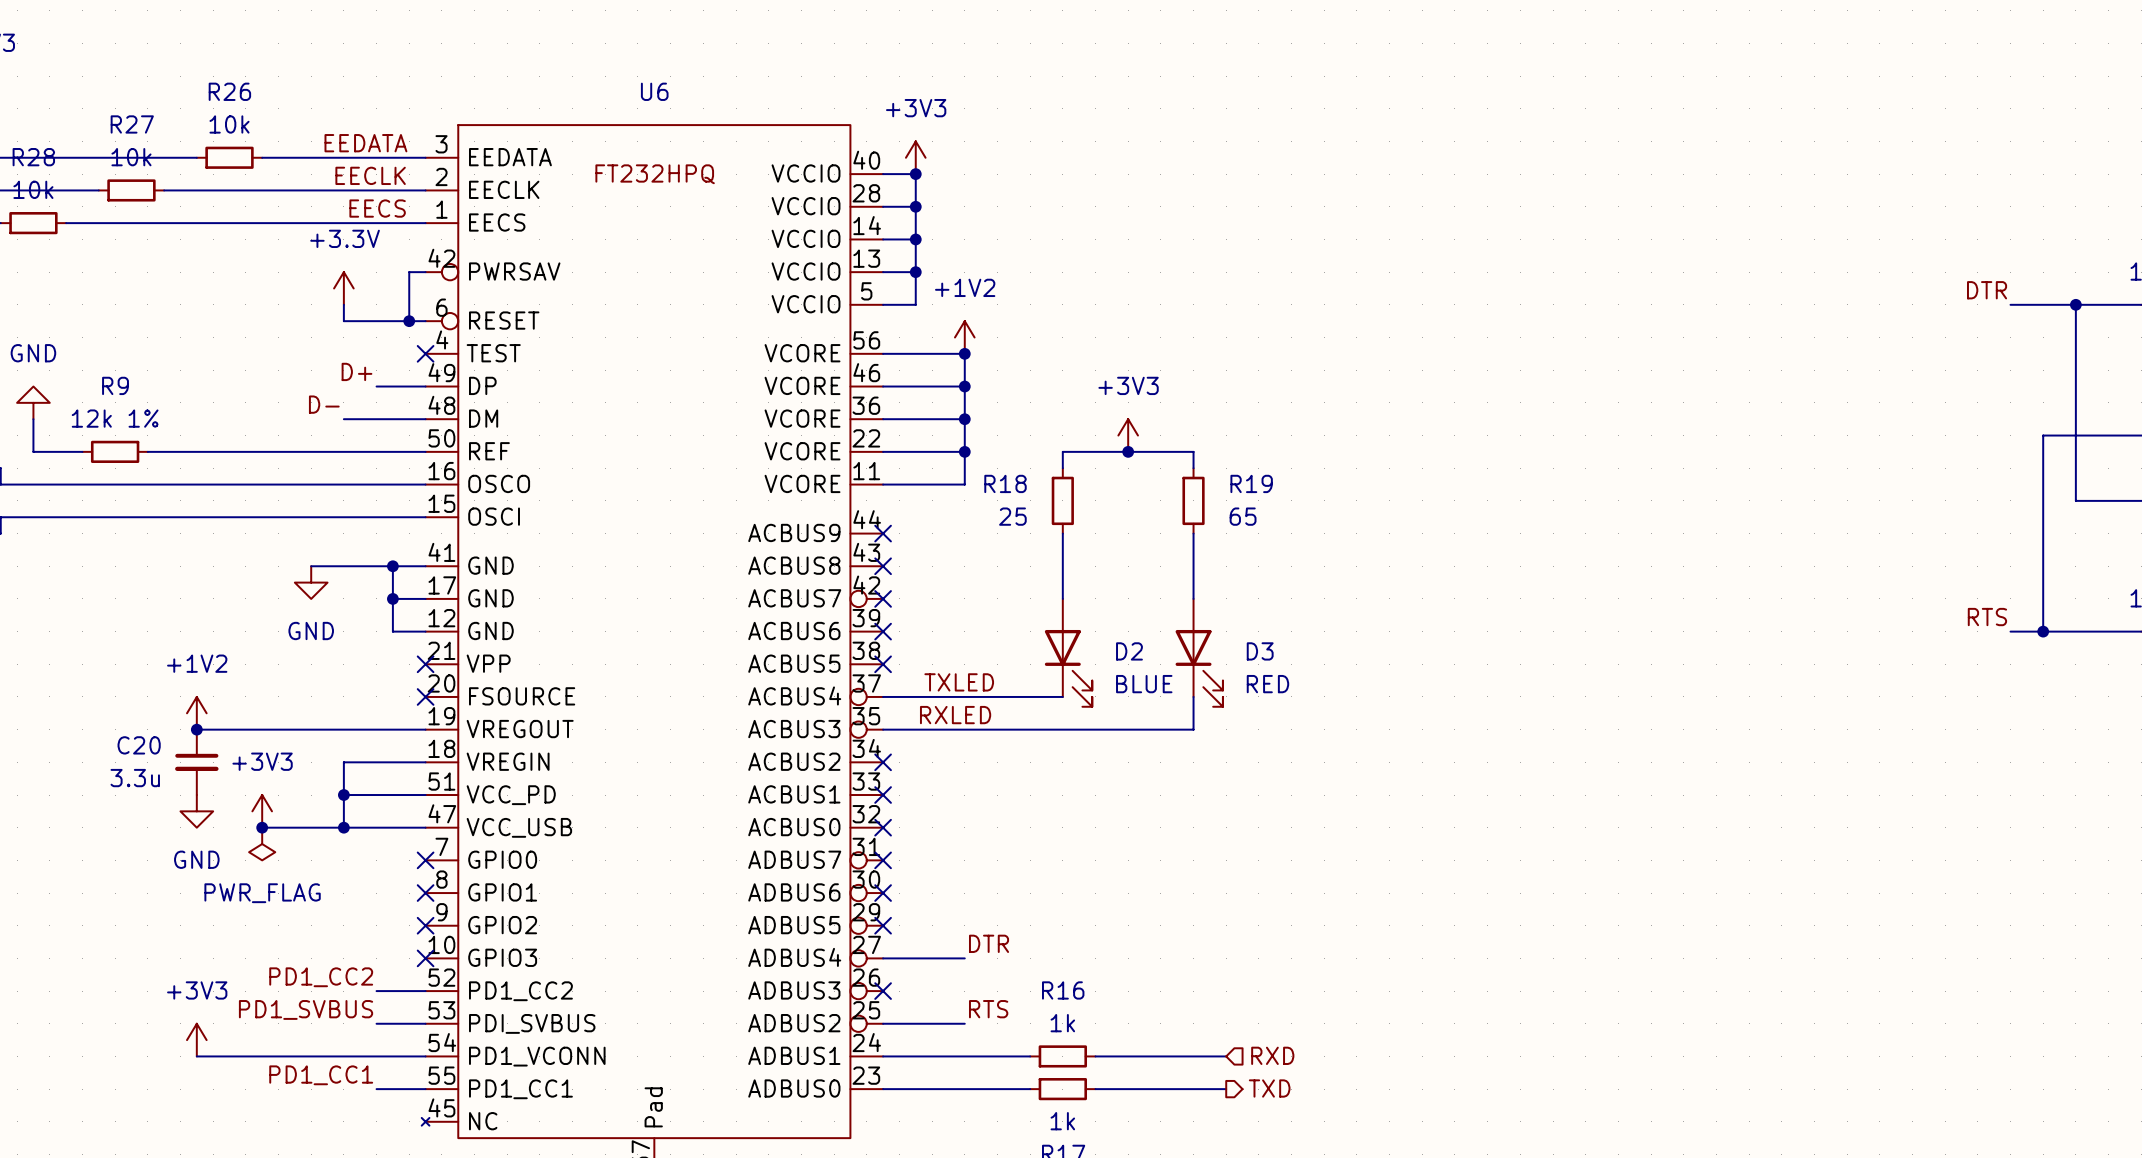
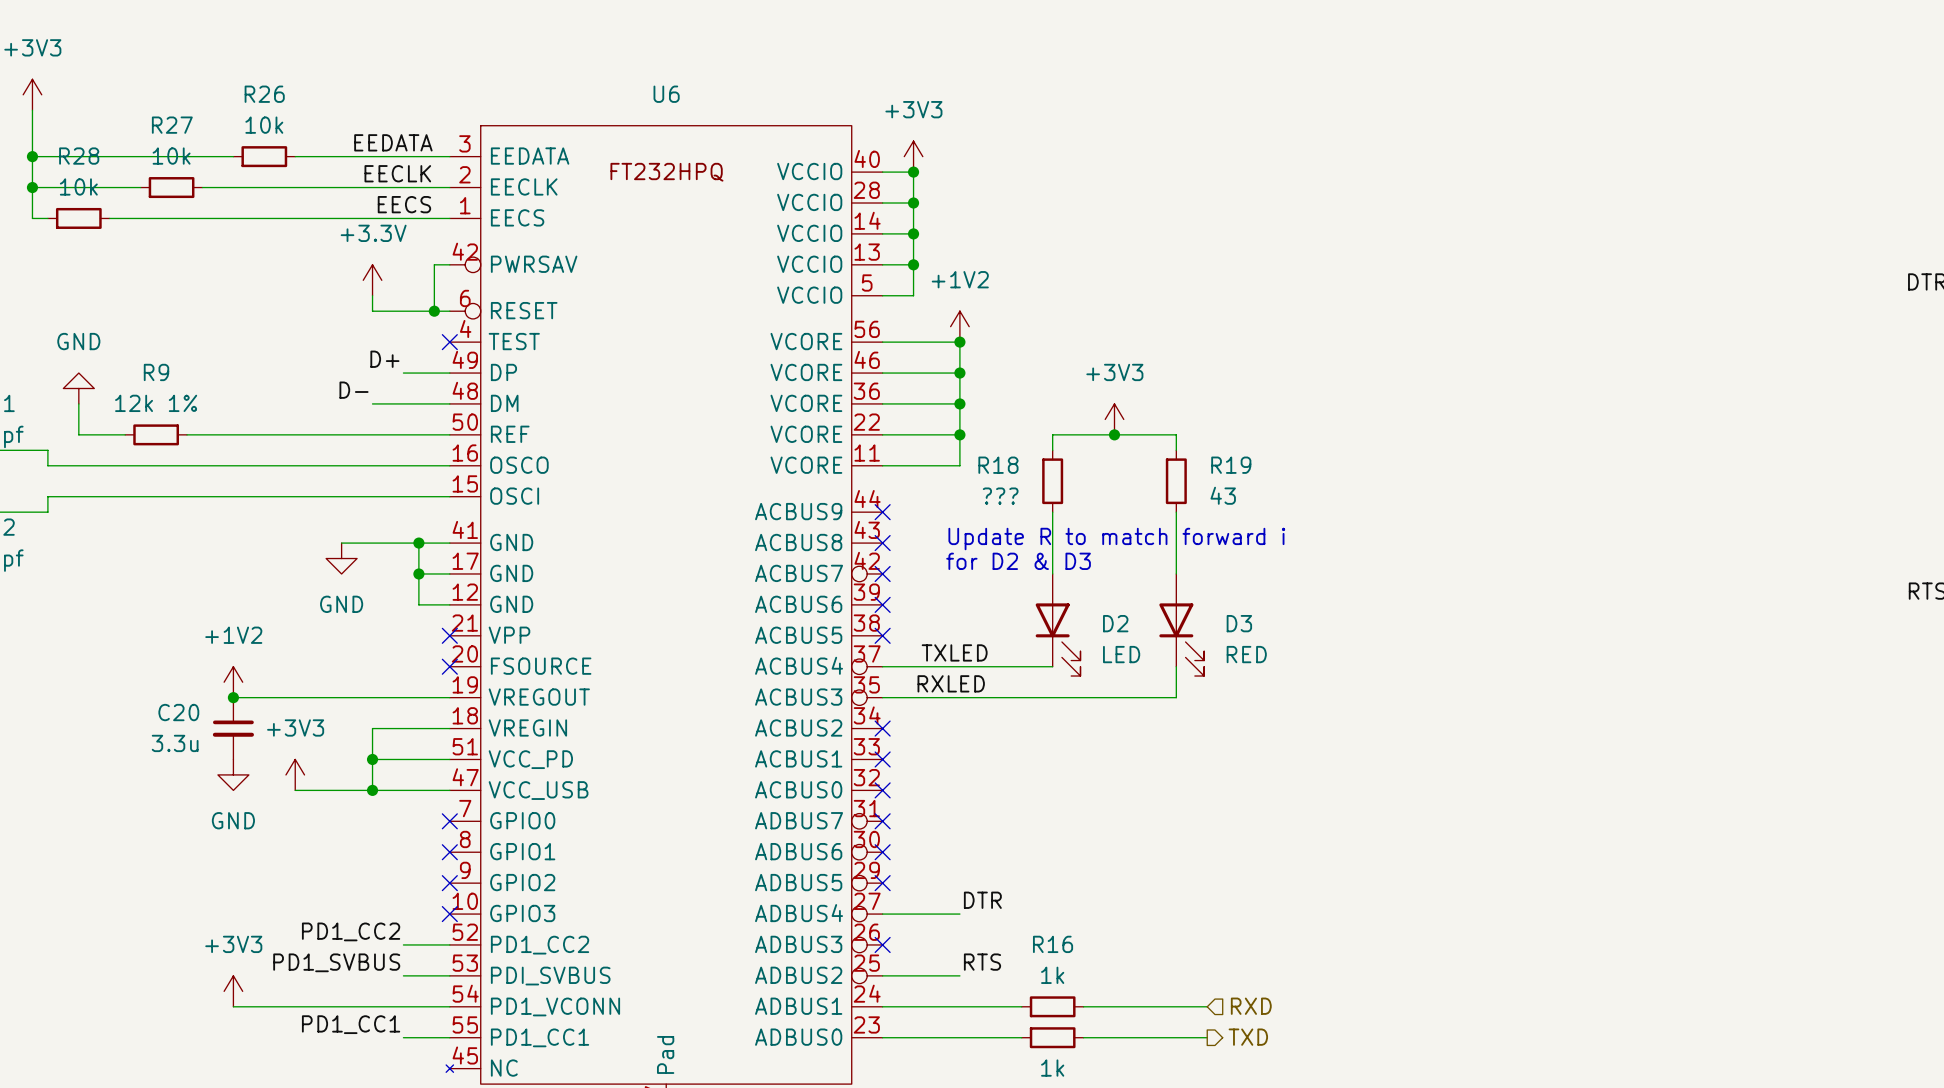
R18 value: 25 (1012, 516) -> ??? (1000, 496)
R19 value: 65 (1243, 516) -> 43 (1223, 495)
text: none -> Update R to match forward i (1116, 539)
text: none -> for D2 & D3 (1018, 561)
D2 value: BLUE (1144, 684) -> LED (1121, 654)
junction: (262, 827) -> none
power symbol: PWR_FLAG (262, 844) -> none

